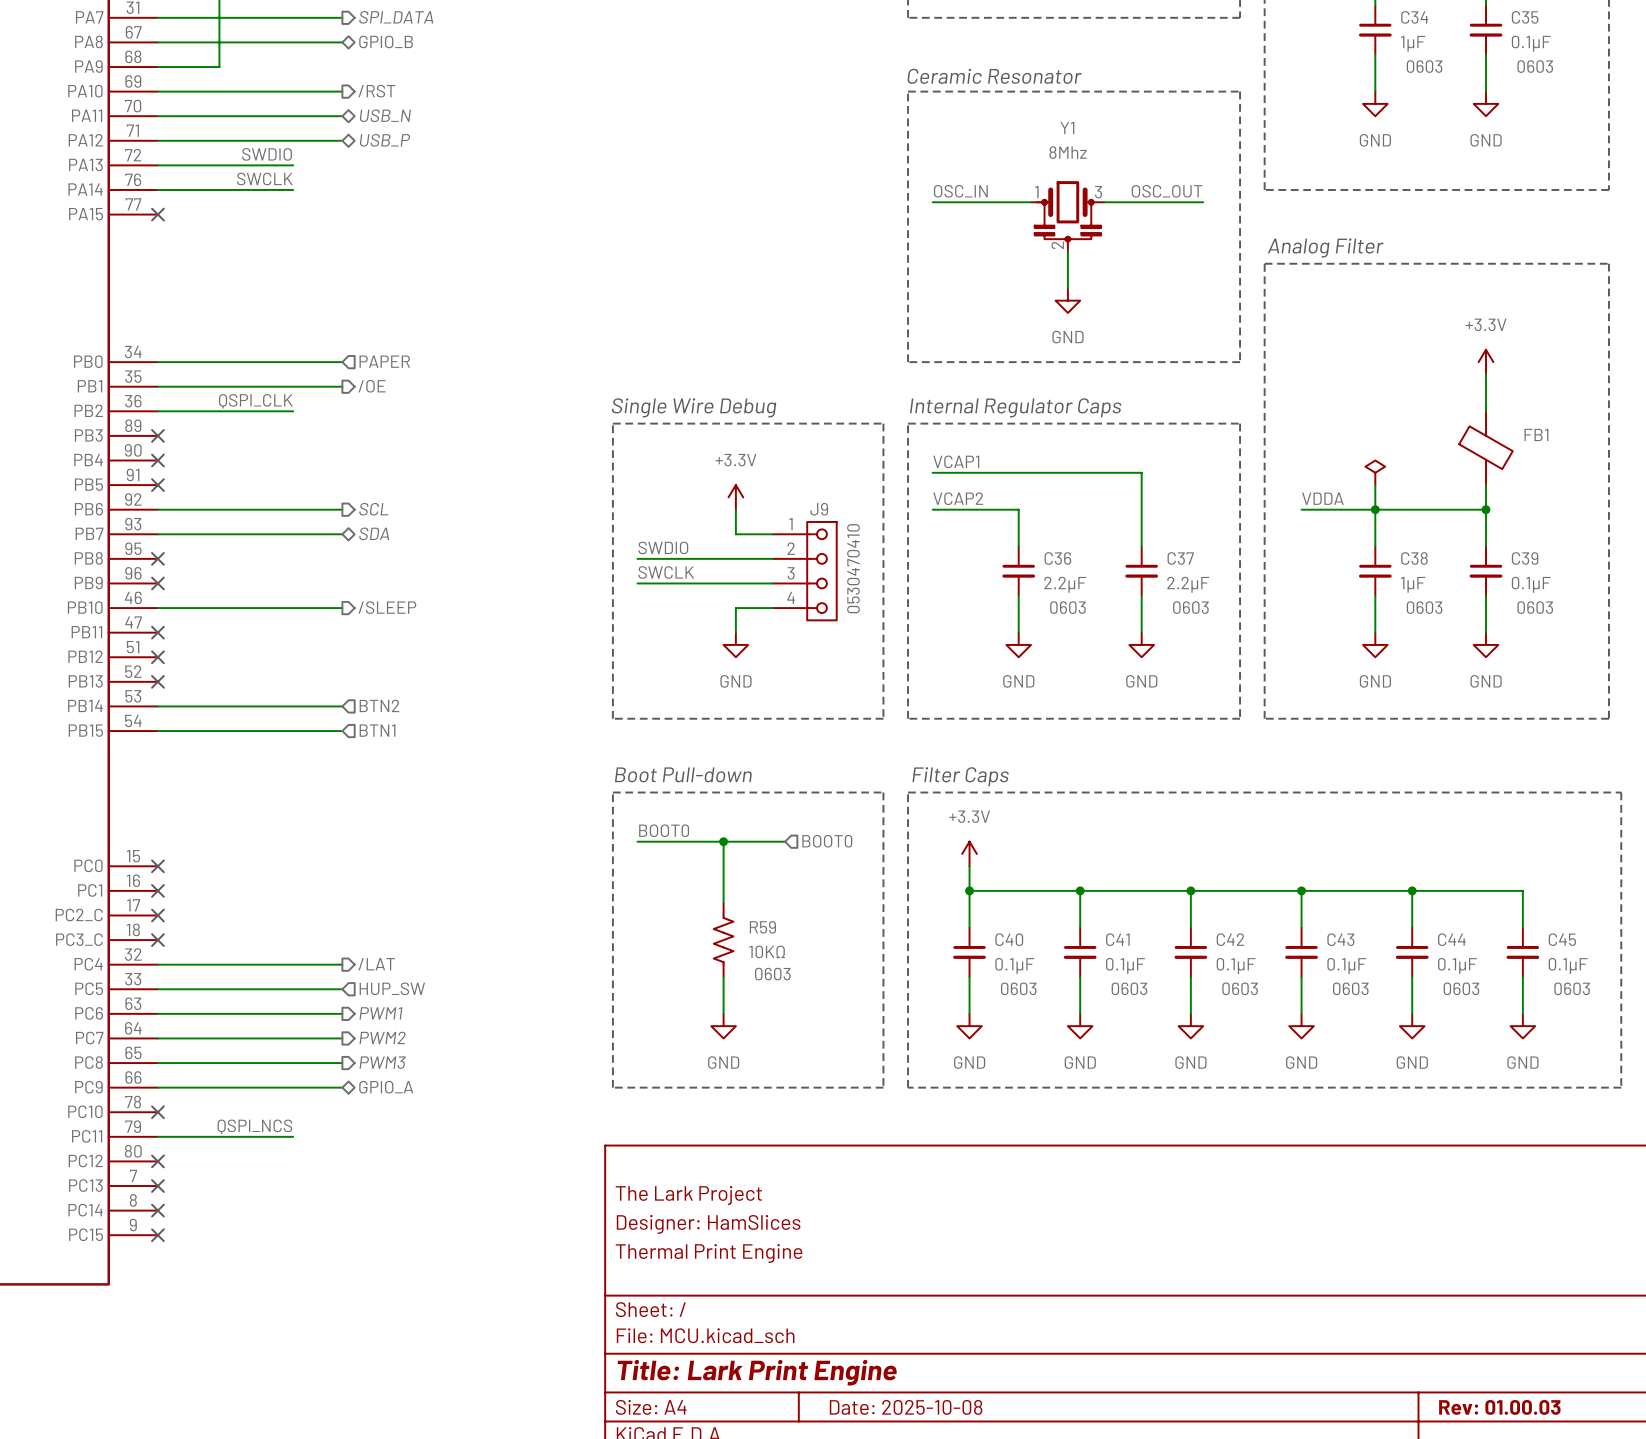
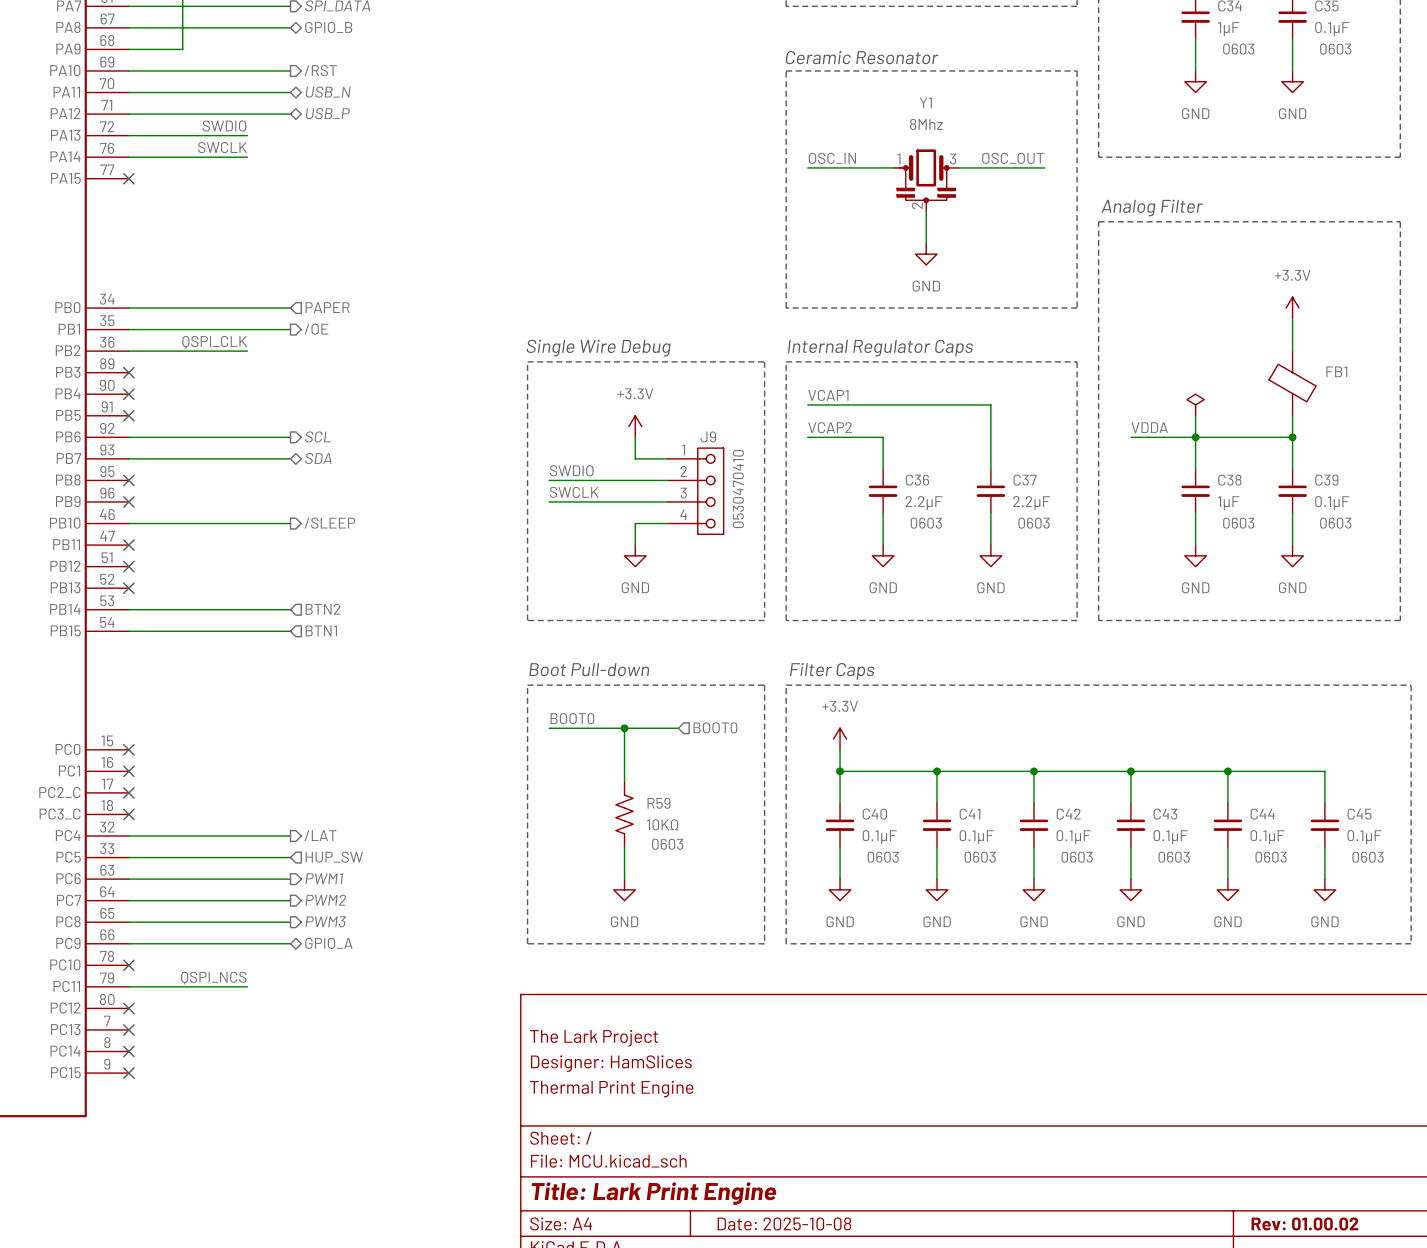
title block: Rev: 01.00.03 (1499, 1407) -> Rev: 01.00.02 (1304, 1223)

